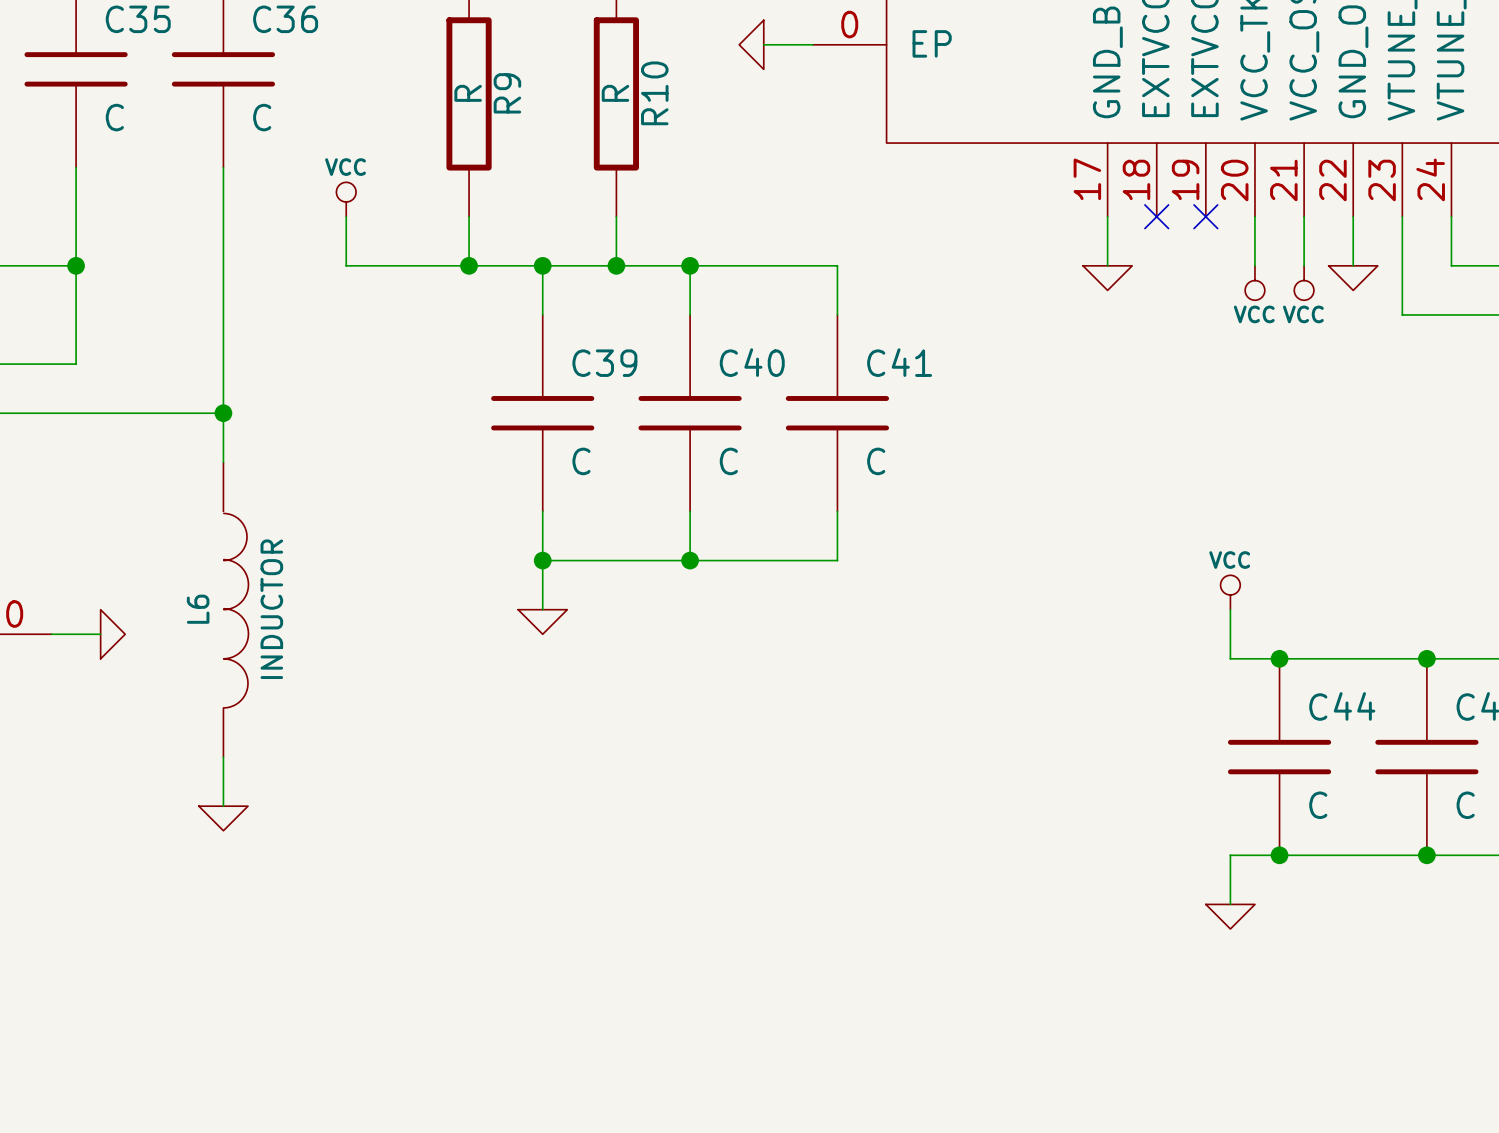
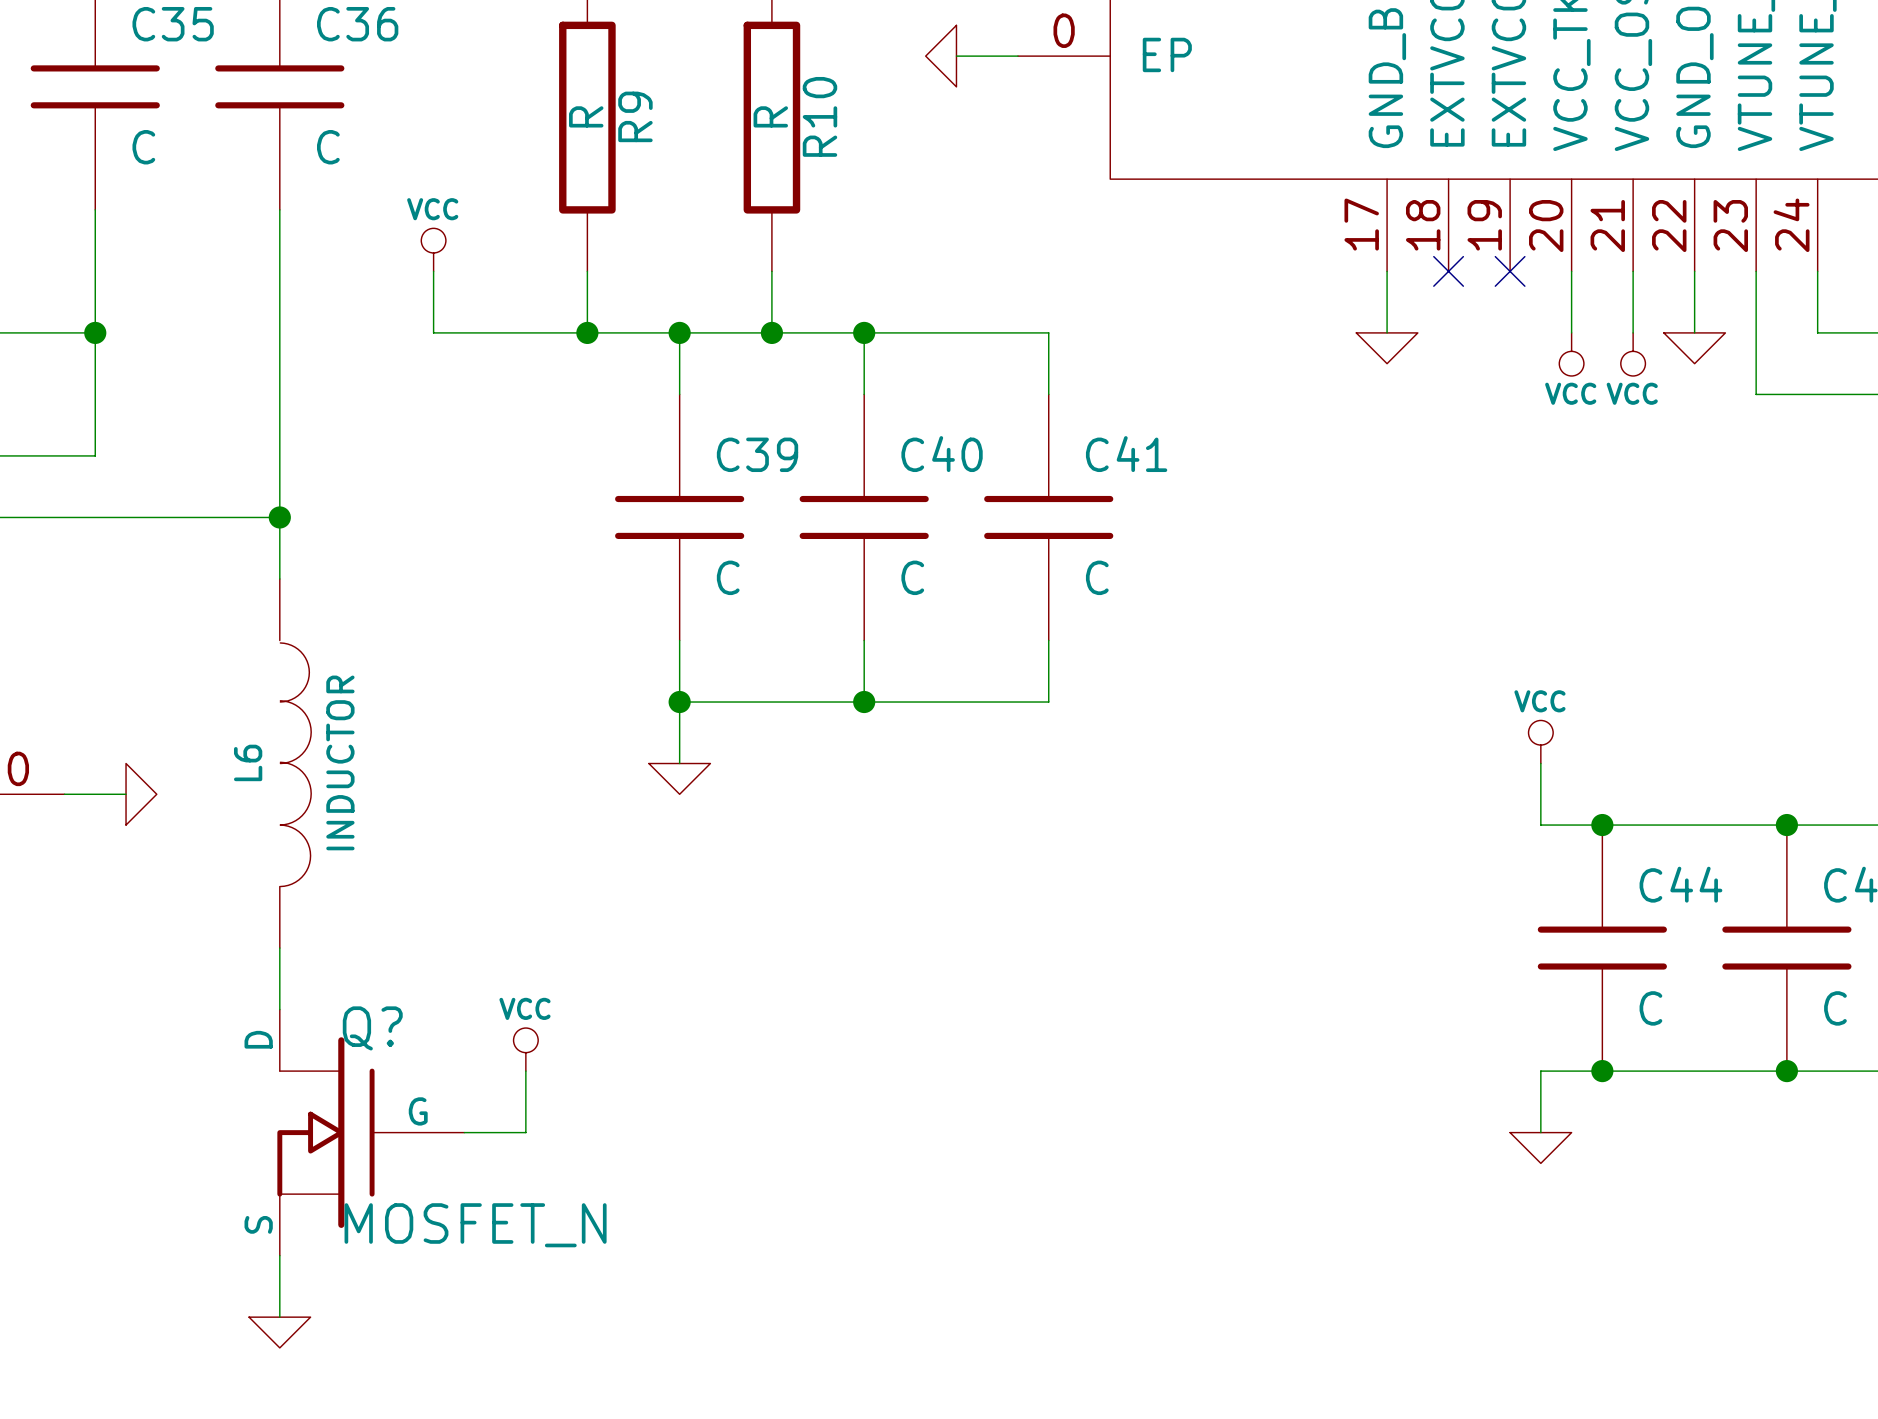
power symbol position: (223, 818) -> (279, 1332)
power symbol: none -> VCC (525, 1049)
wire: none -> (525, 1071) (525, 1132) (464, 1132)
Q?: none -> MOSFET_N (370, 1132)
wire: none -> (279, 1255) (279, 1317)

